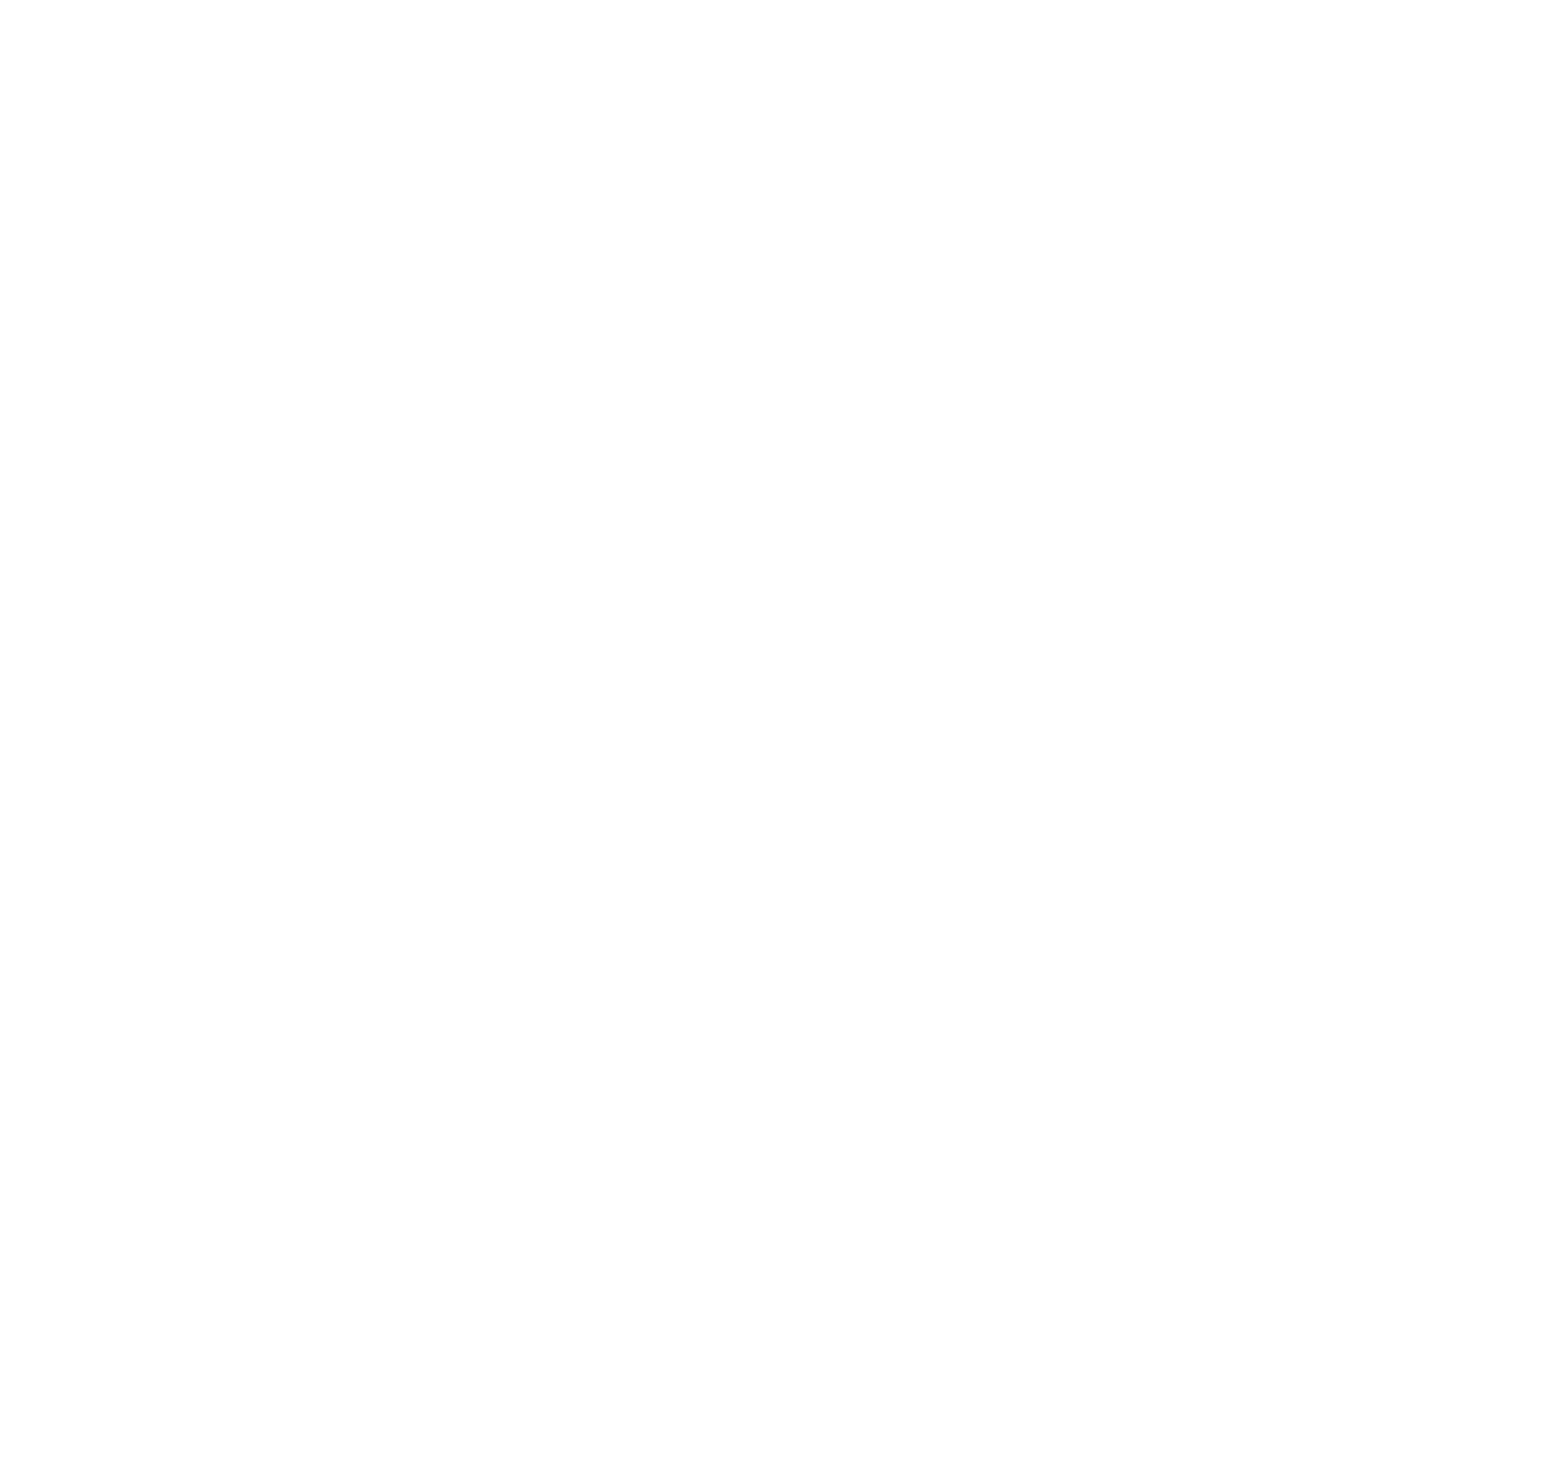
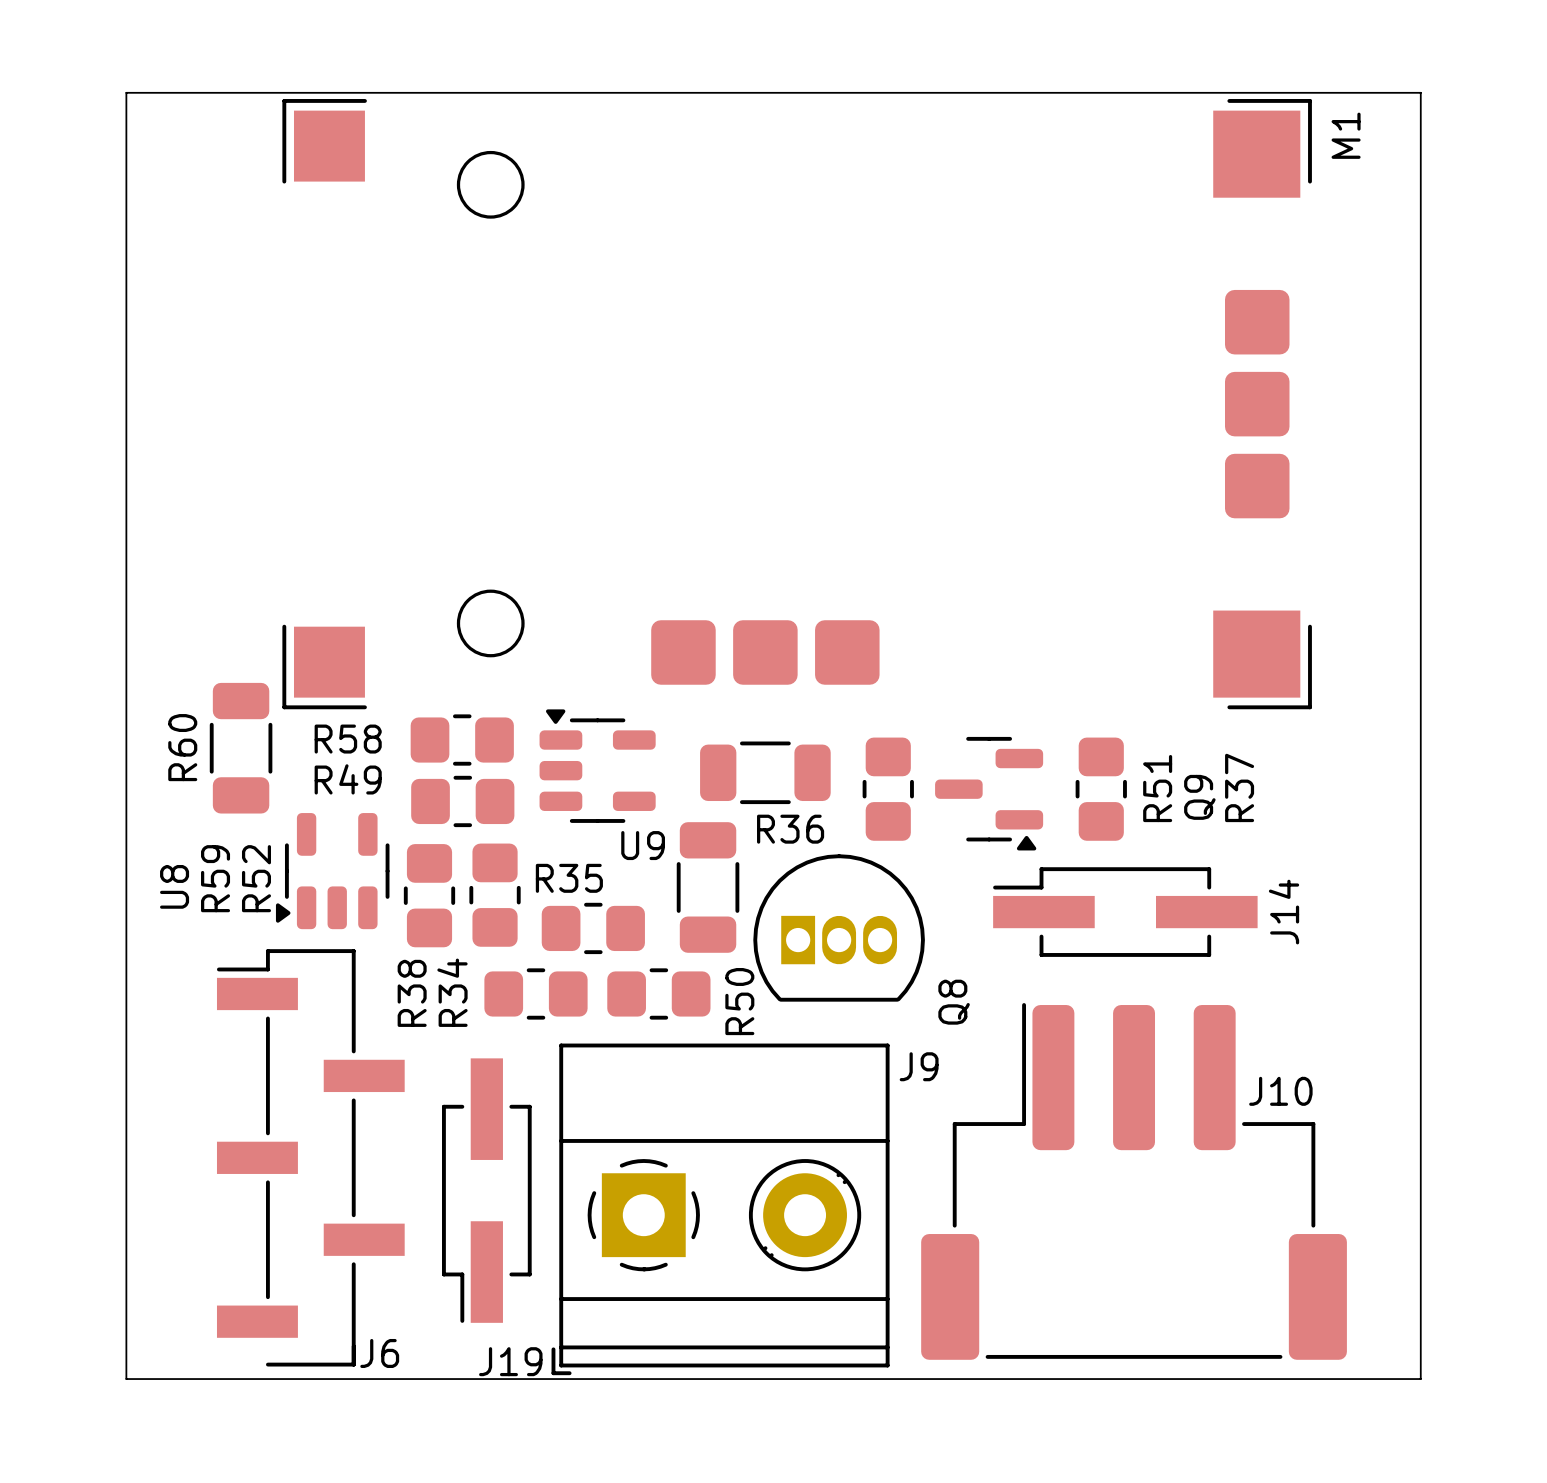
board edge: none -> (126, 92) (1420, 92) (1420, 1379) (126, 1379) (126, 92)
M1: none -> (797, 404)
R58: none -> (462, 740)
R60: none -> (241, 748)
U9: none -> (597, 766)
R36: none -> (765, 772)
R51: none -> (888, 789)
R37: none -> (1101, 789)
Q9: none -> (989, 793)
R49: none -> (462, 801)
U8: none -> (332, 871)
R50: none -> (708, 887)
R59: none -> (429, 895)
R52: none -> (495, 895)
J14: none -> (1125, 912)
Q8: none -> (839, 927)
R35: none -> (593, 928)
R38: none -> (535, 993)
R34: none -> (658, 993)
J6: none -> (310, 1157)
J10: none -> (1134, 1181)
J19: none -> (486, 1190)
J9: none -> (720, 1209)

